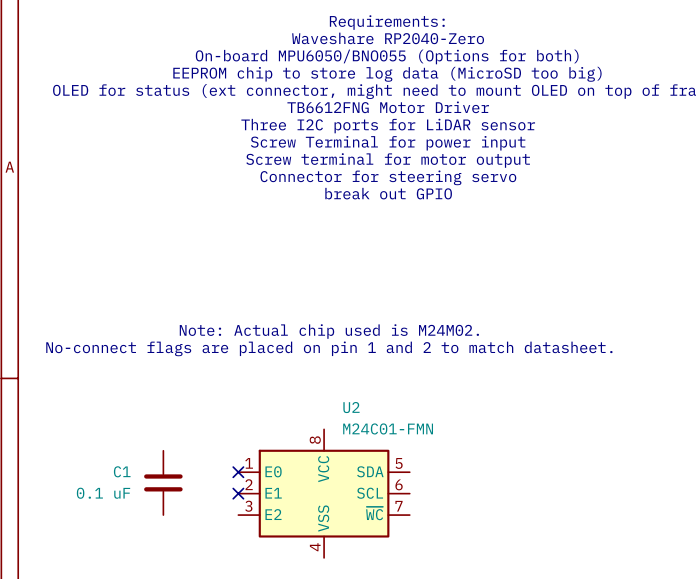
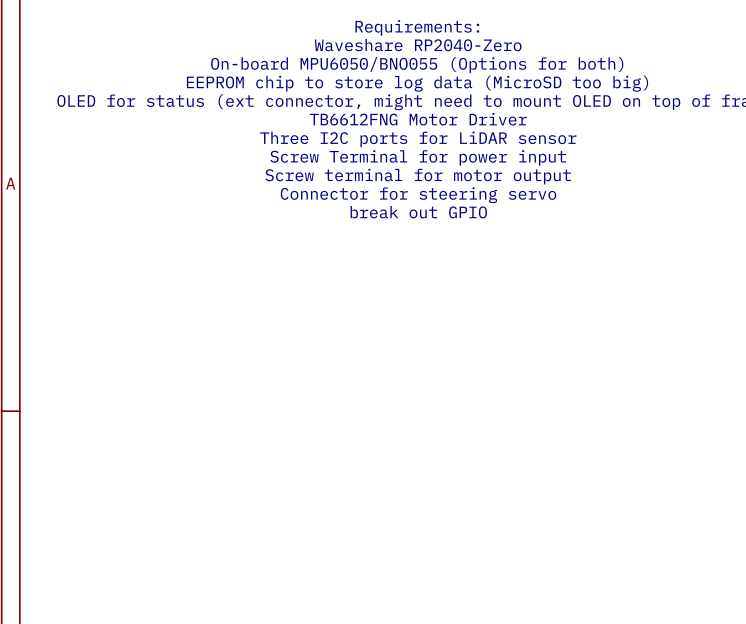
text: Note: Actual chip used is M24M02. (329, 331) -> none
text: No-connect flags are placed on pin 1 and 2 to match datasheet. (329, 348) -> none
no-connect mark: (238, 472) -> none
C1: 0.1 uF (163, 482) -> none
no-connect mark: (238, 493) -> none
U2: M24C01-FMN (324, 493) -> none

